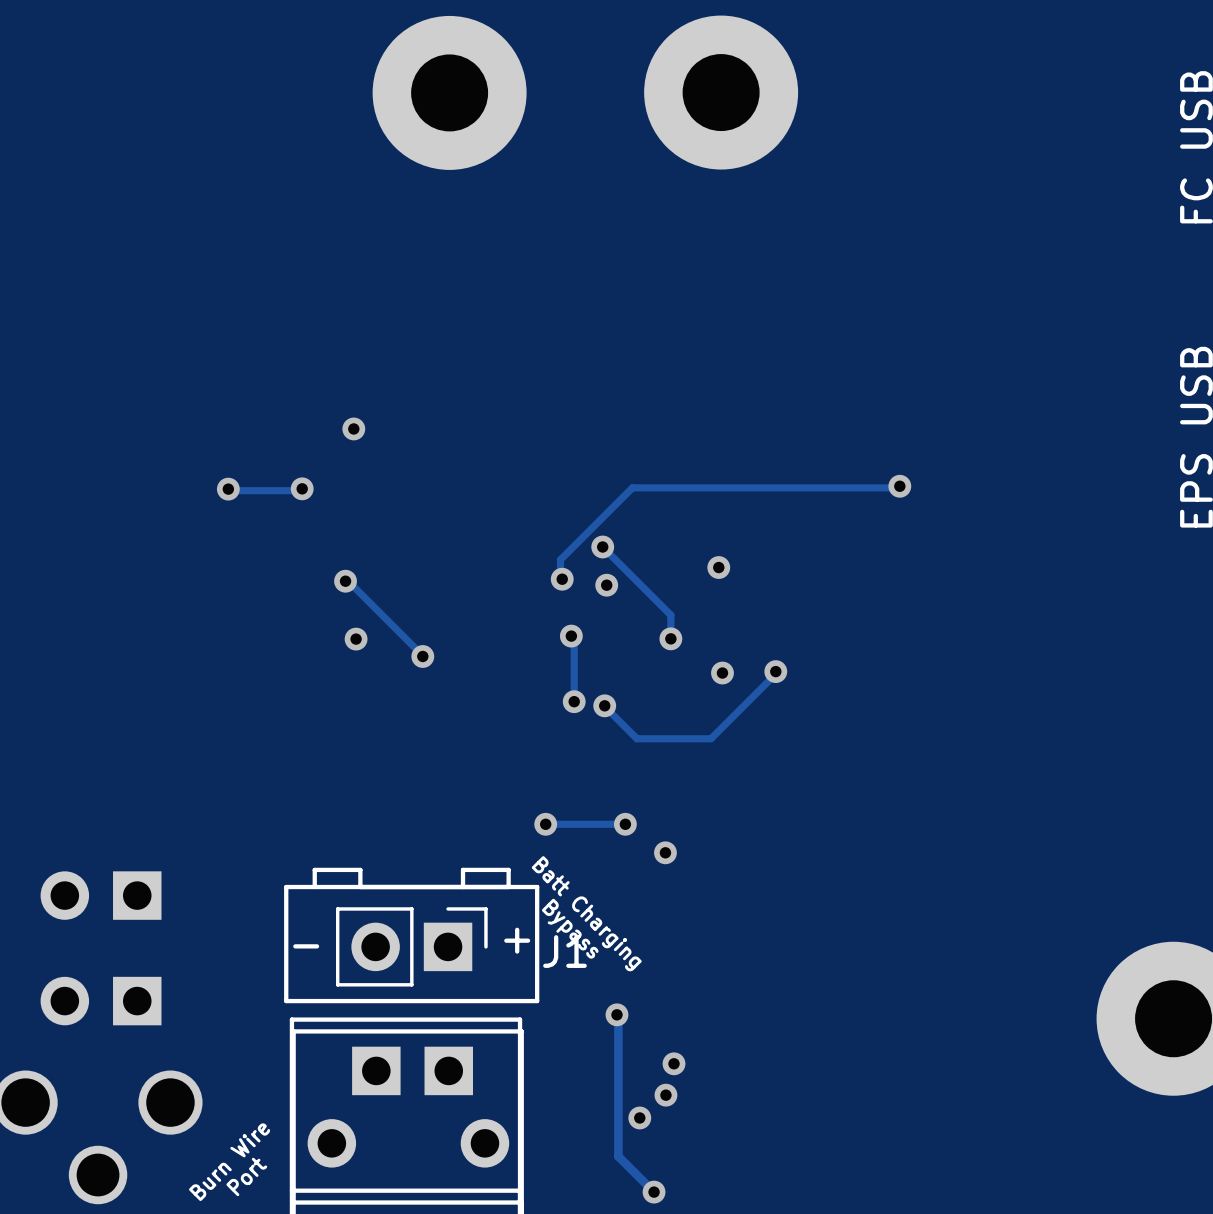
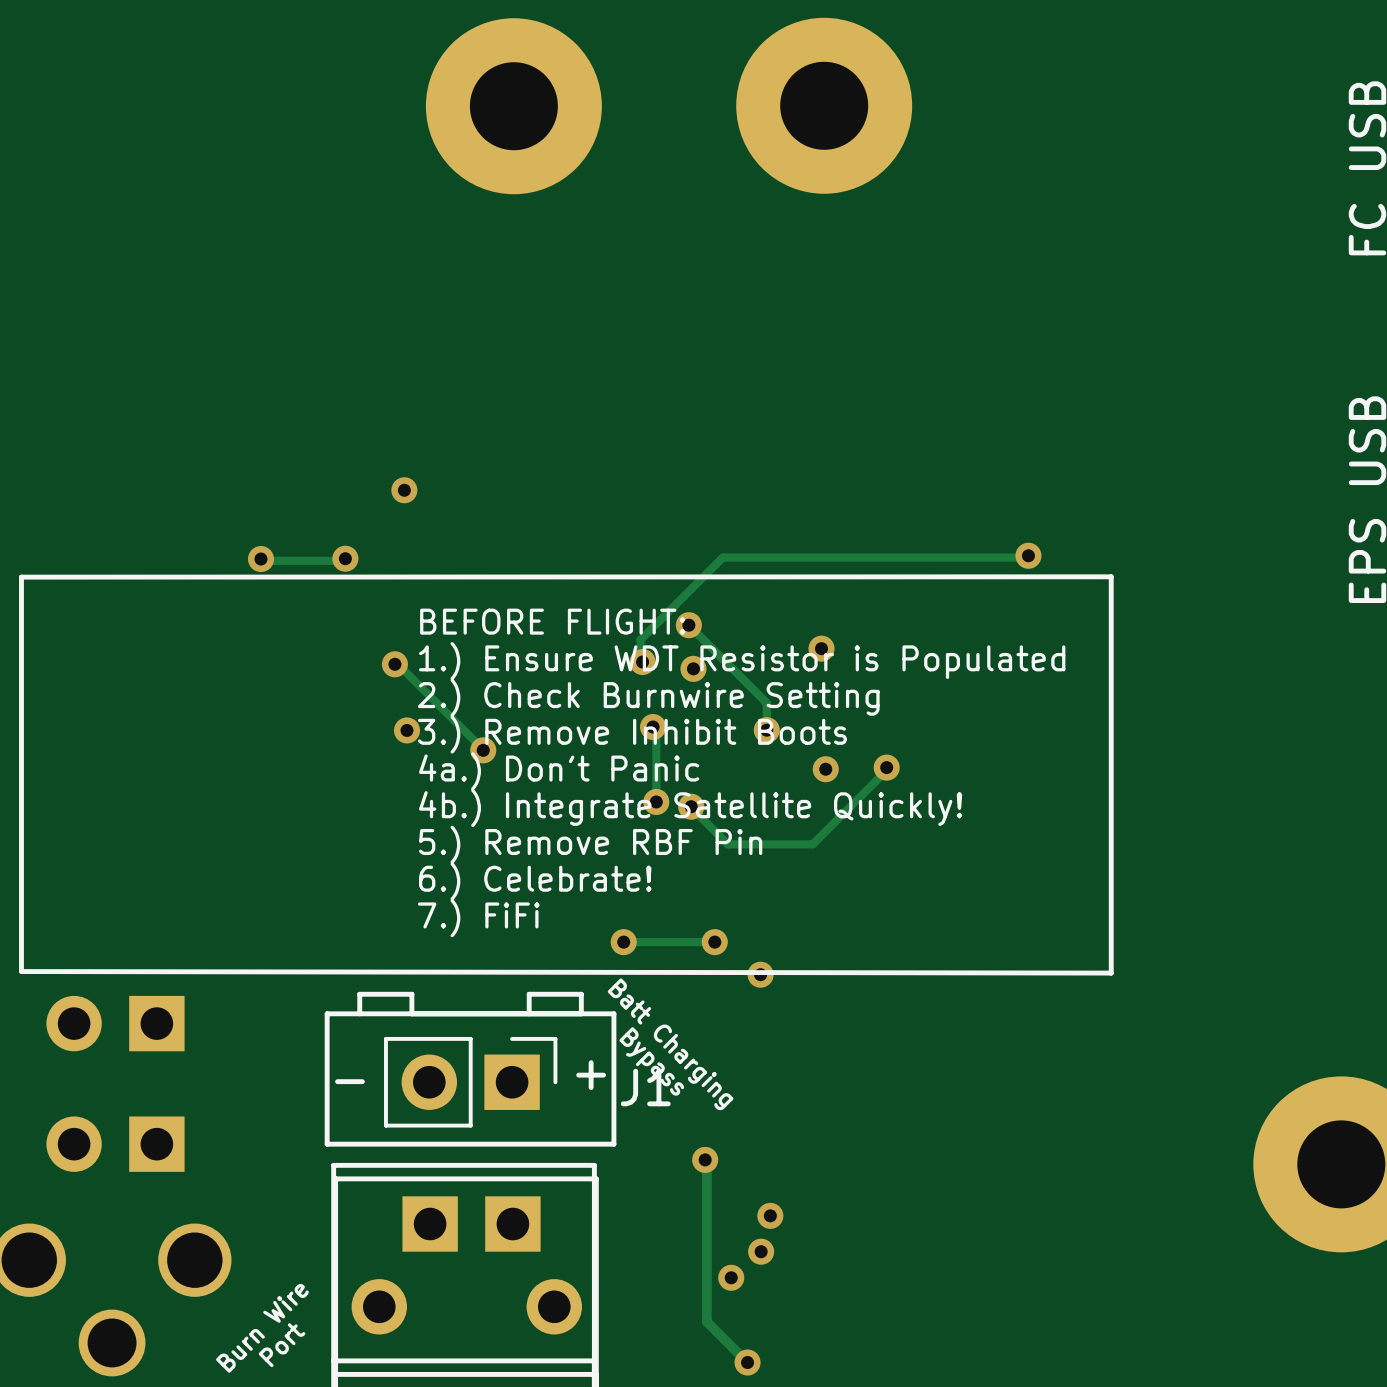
text: none -> BEFORE FLIGHT: (552, 621)
text: none -> 1.) Ensure WDT Resistor is Populated (742, 661)
text: none -> 2.) Check Burnwire Setting (648, 697)
text: none -> 3.) Remove Inhibit Boots (632, 734)
text: none -> 4a.) Don't Panic (559, 771)
text: none -> 4b.) Integrate Satellite Quickly! (690, 807)
text: none -> 5.) Remove RBF Pin (590, 844)
text: none -> 6.) Celebrate! (535, 881)
text: none -> 7.) FiFi (478, 918)
line: none -> (21, 971) (21, 577) (1111, 576) (1111, 973) (21, 971)

